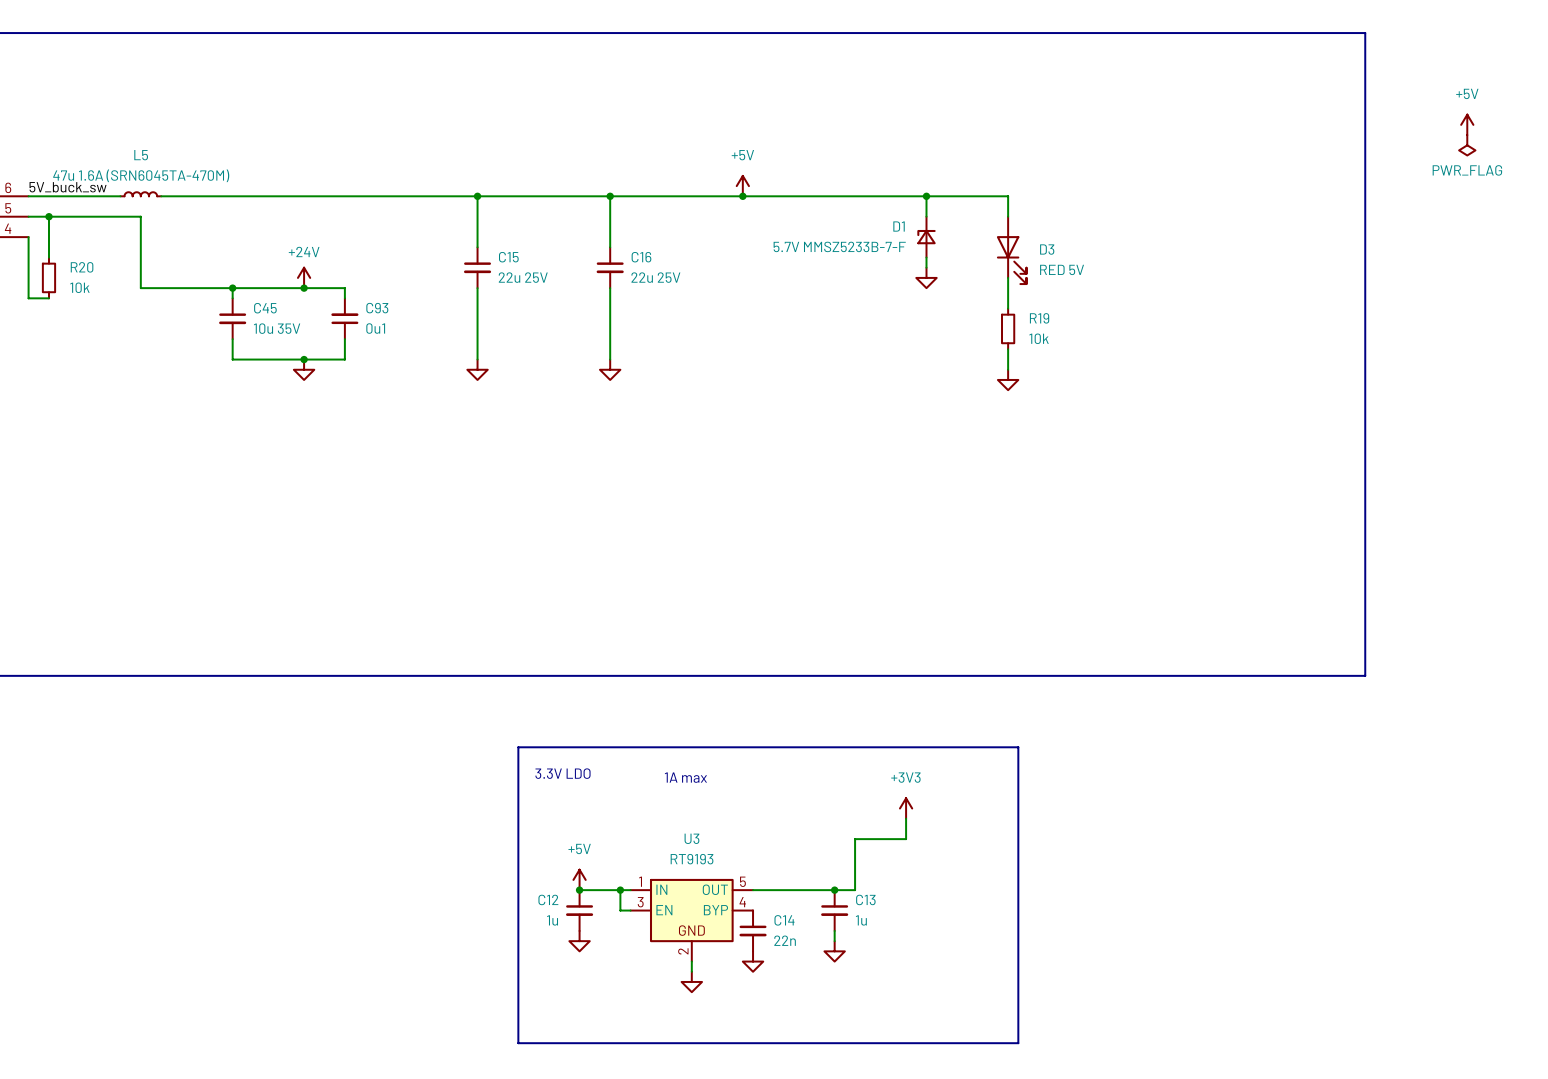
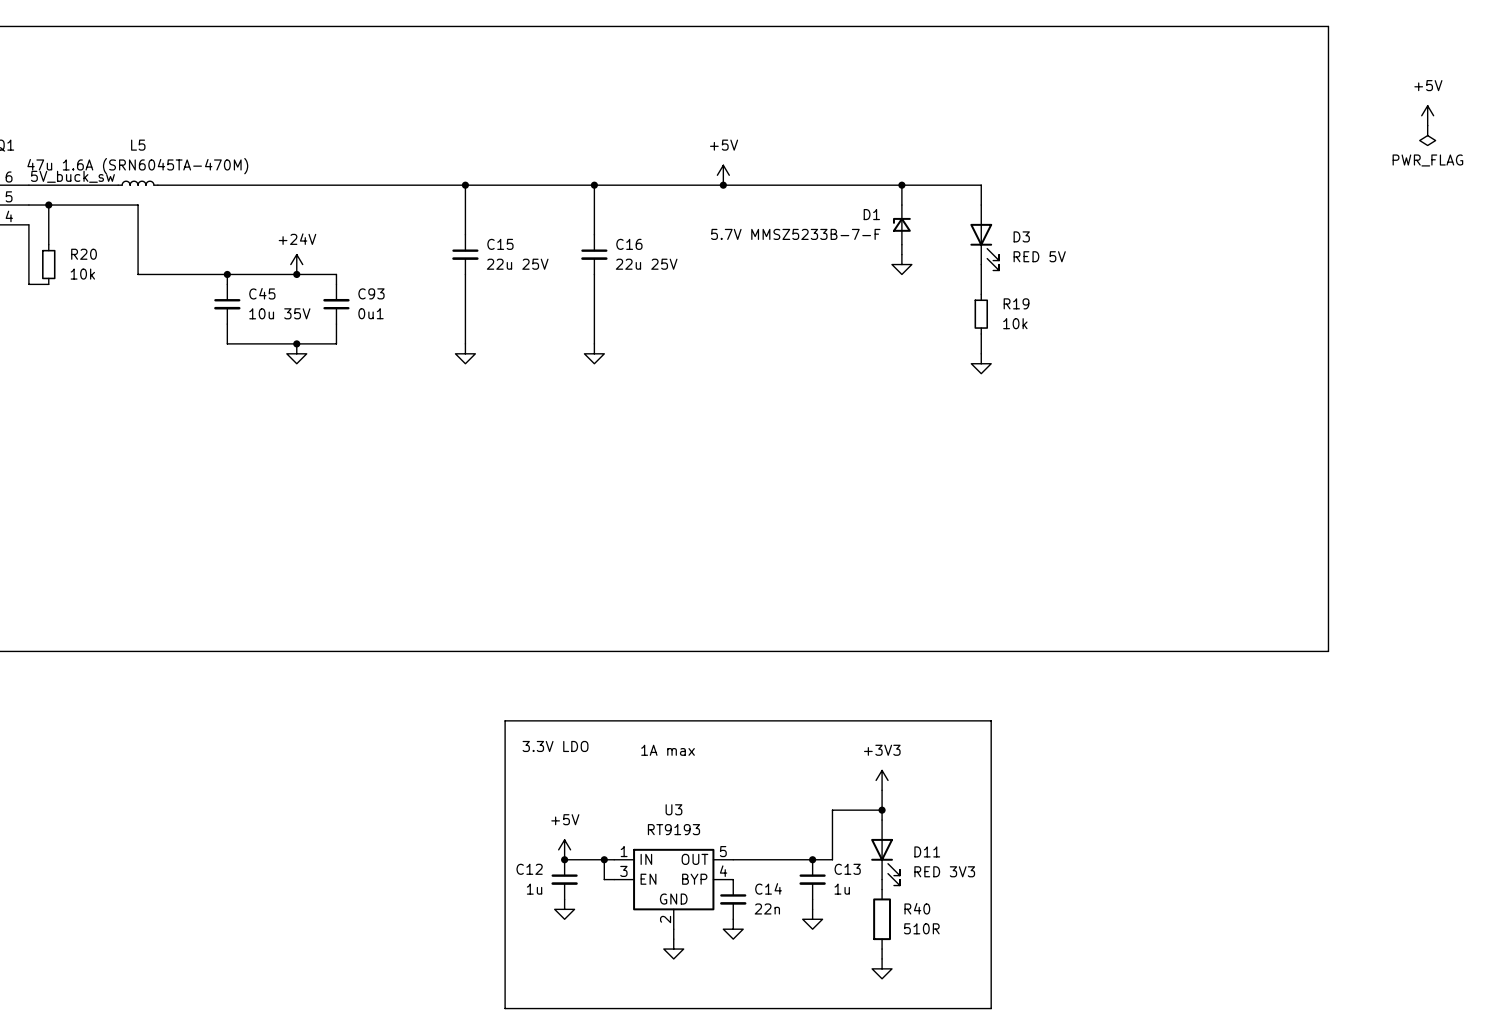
wire: none -> (882, 810) (882, 820)
junction: none -> (882, 810)
D11: none -> RED 3V3 (885, 852)
wire: none -> (882, 879) (882, 889)
R40: none -> 510R (882, 919)
wire: none -> (882, 949) (882, 958)
power symbol: none -> (882, 968)

